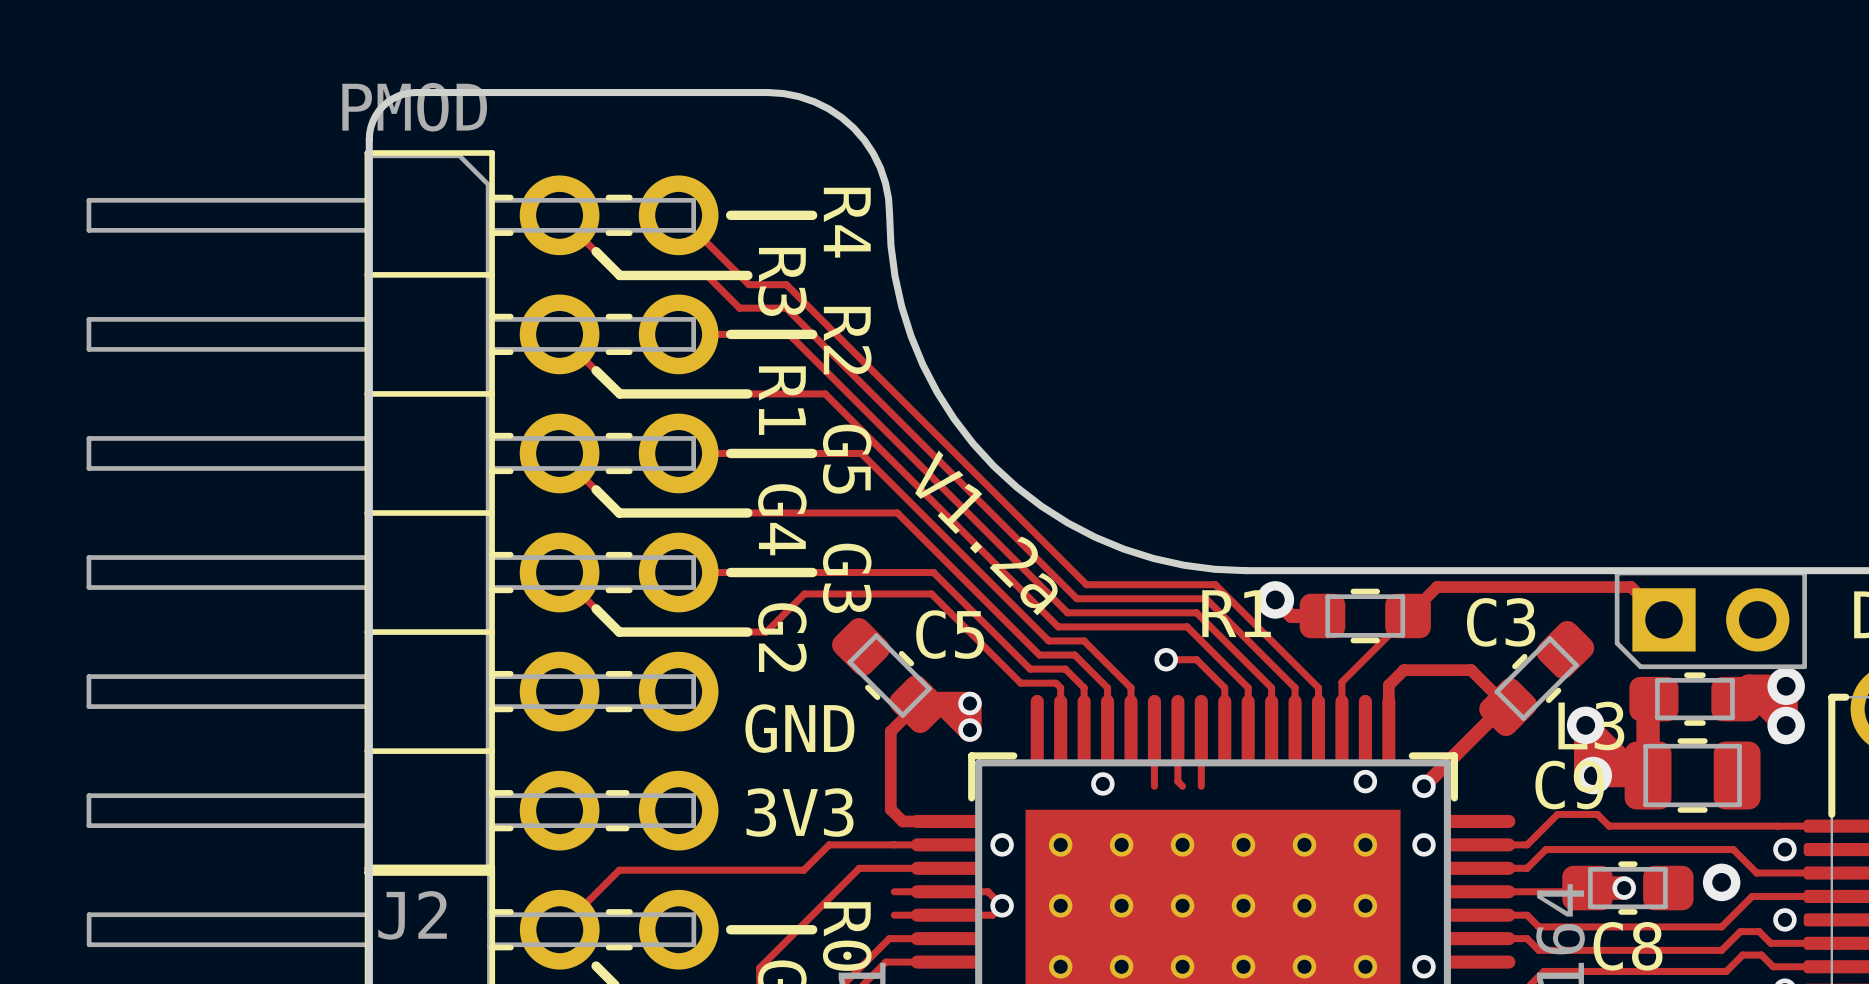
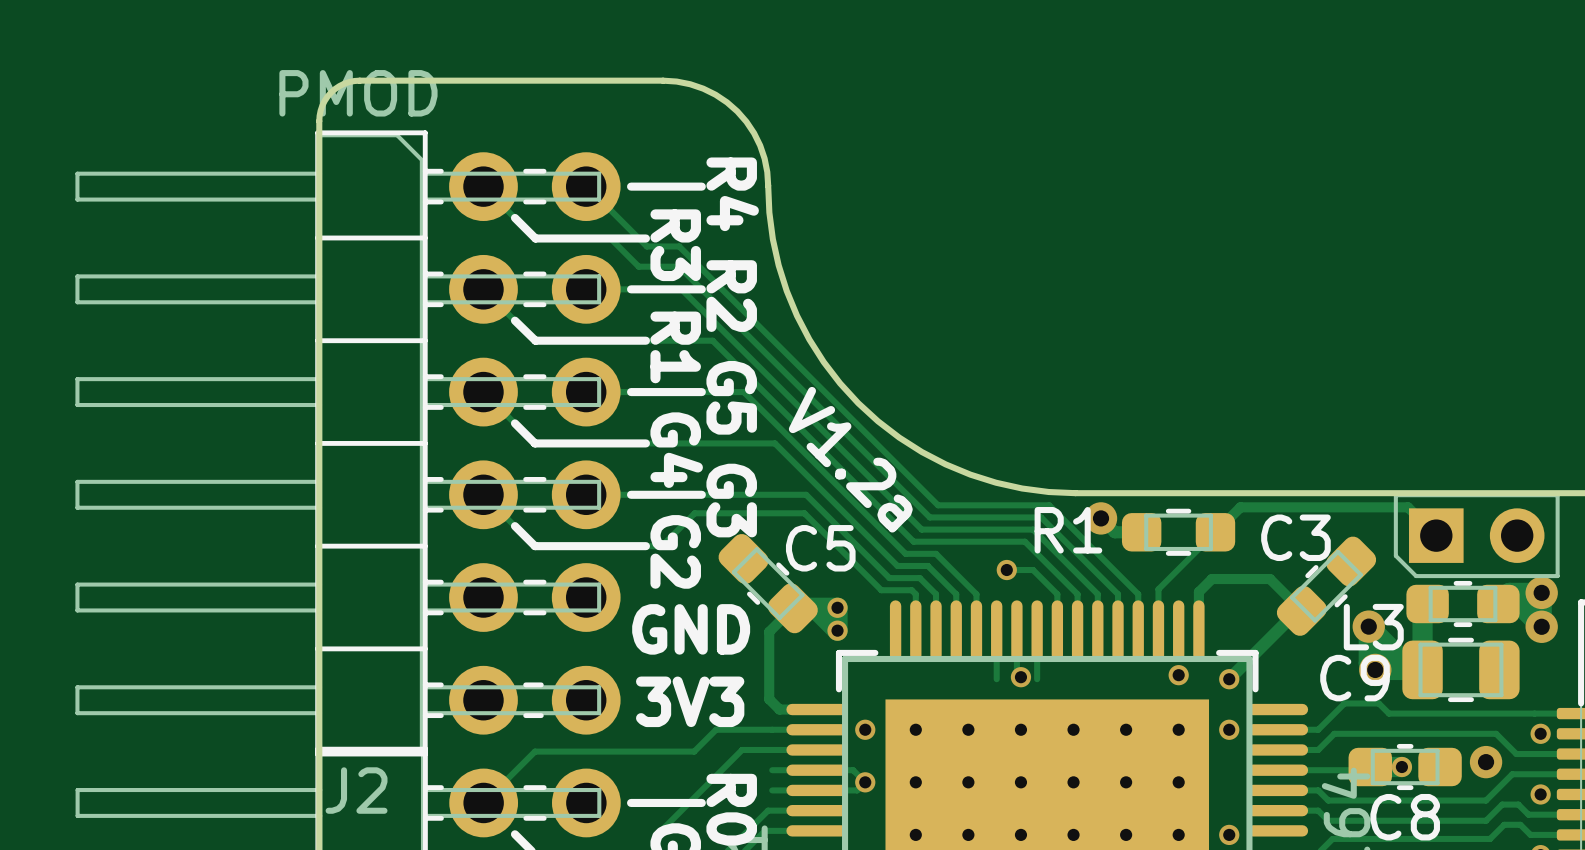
via position: (1102, 783) -> (1020, 677)

